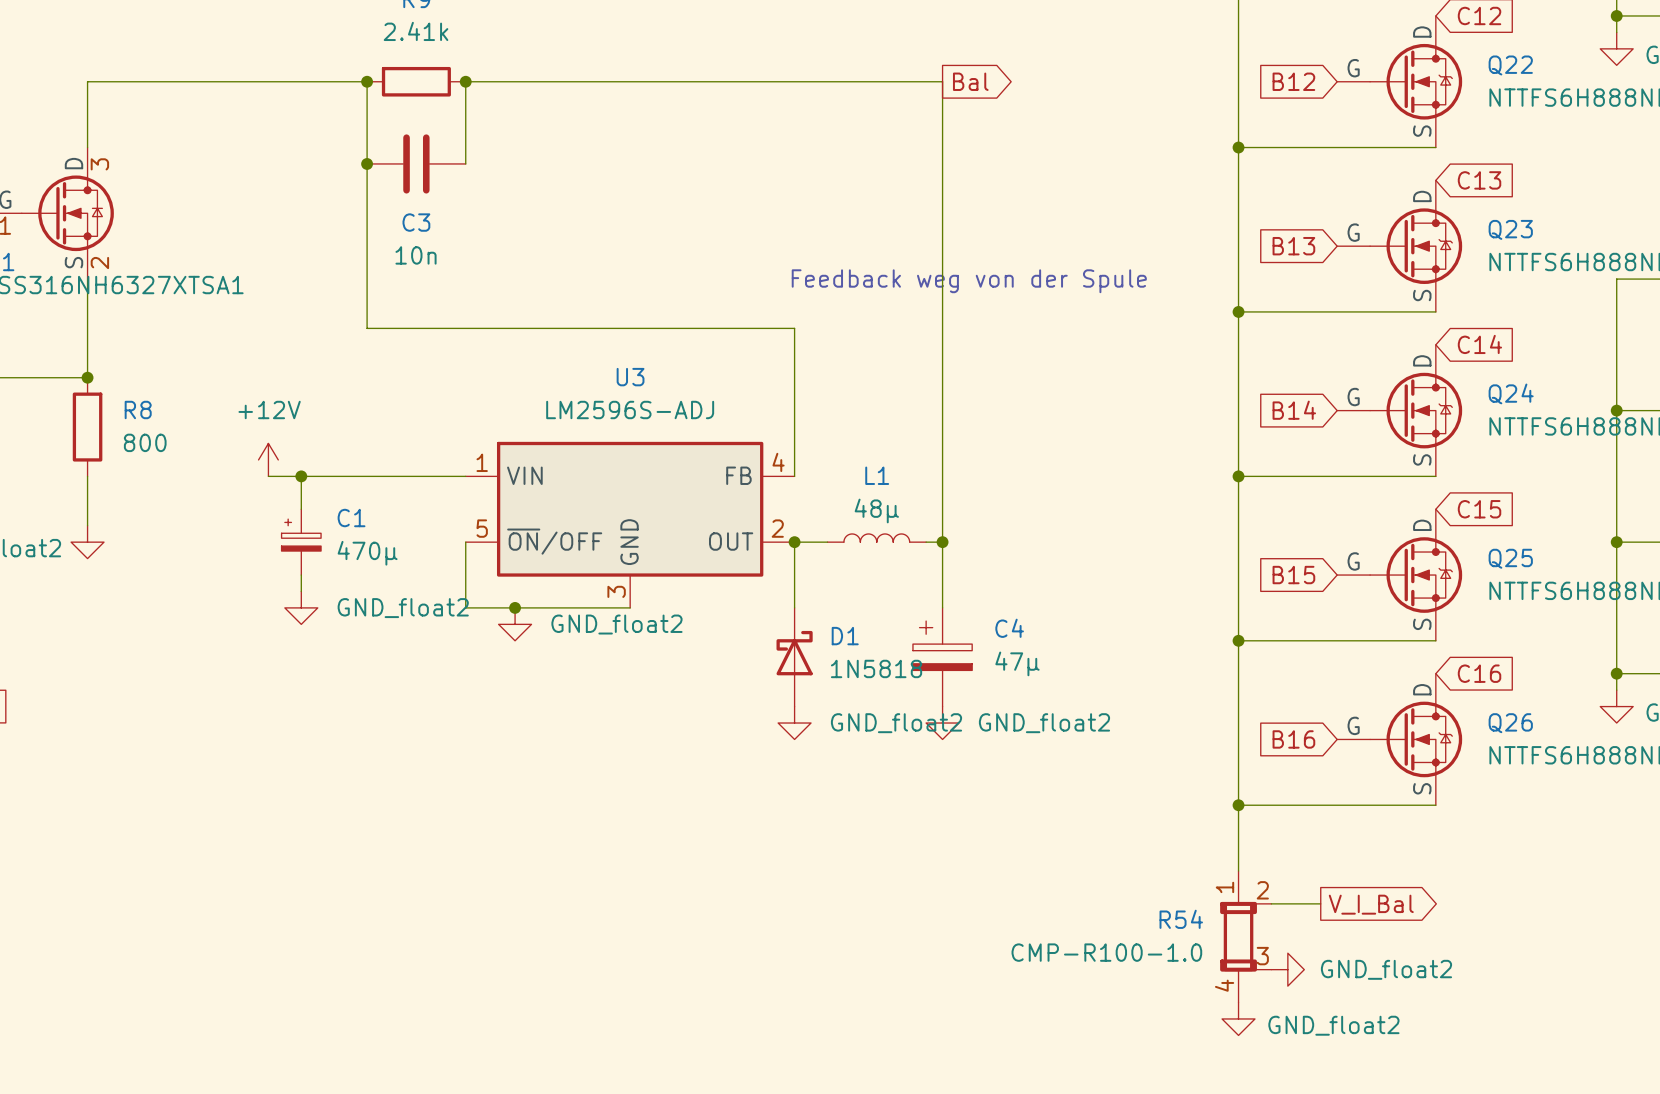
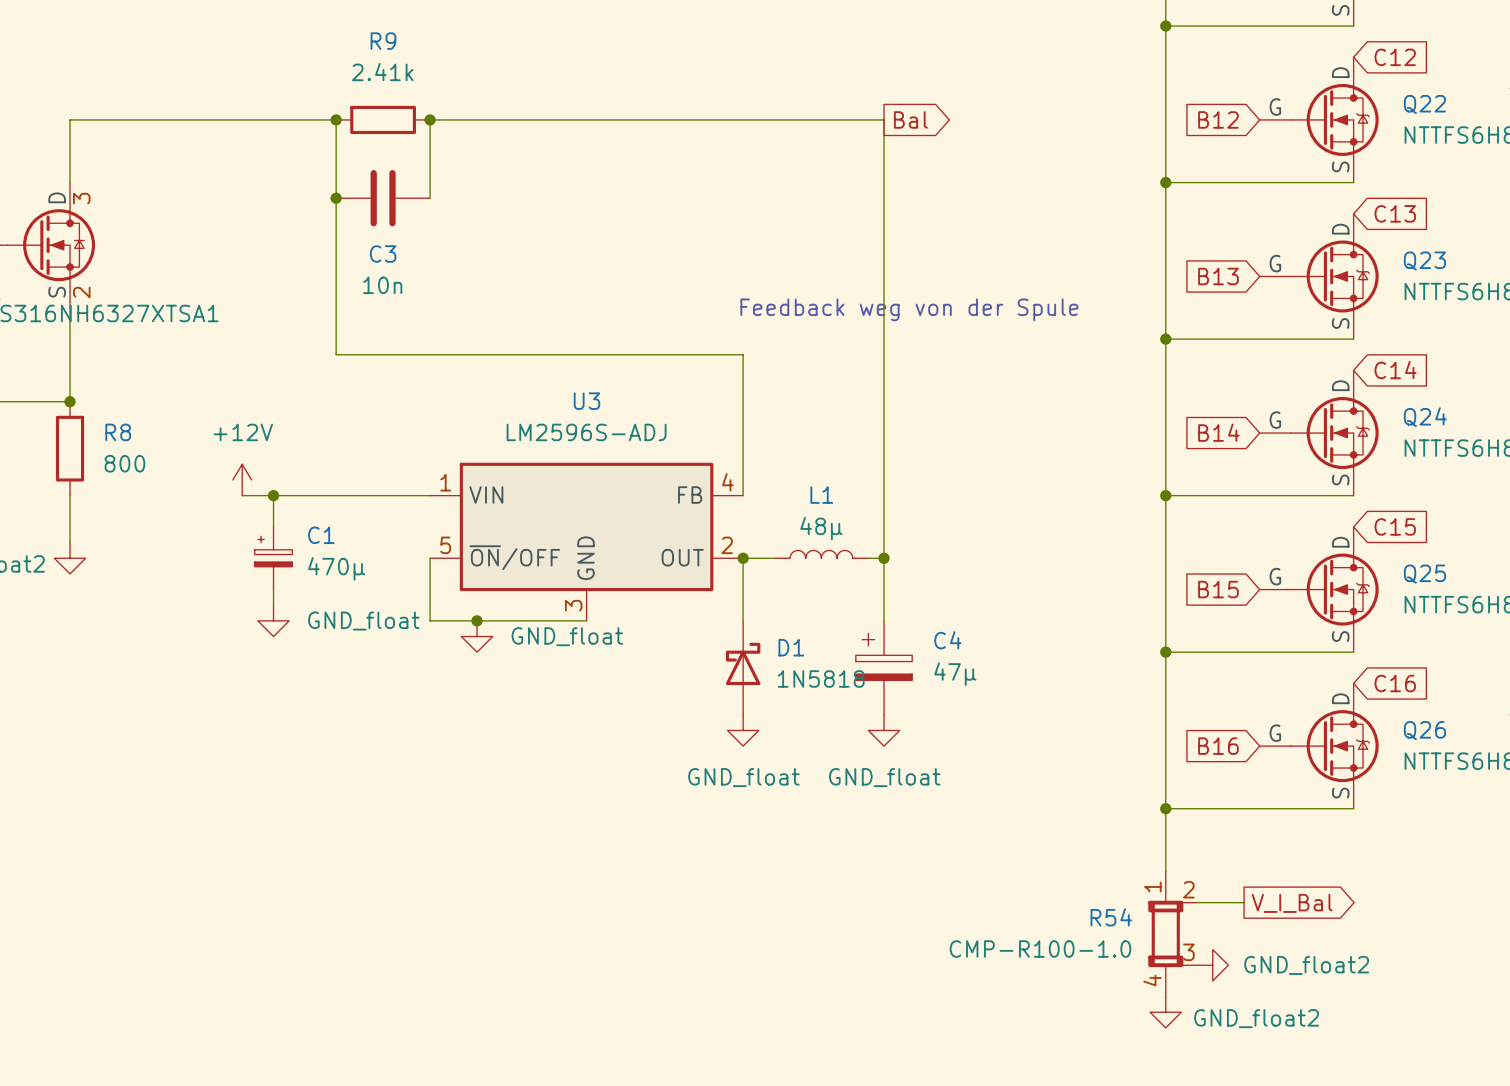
power symbol: GND_float2 (301, 607) -> GND_float (273, 620)
power symbol: GND_float2 (515, 624) -> GND_float (477, 636)
power symbol: GND_float2 (794, 723) -> GND_float (743, 730)
power symbol: GND_float2 (942, 723) -> GND_float (884, 730)

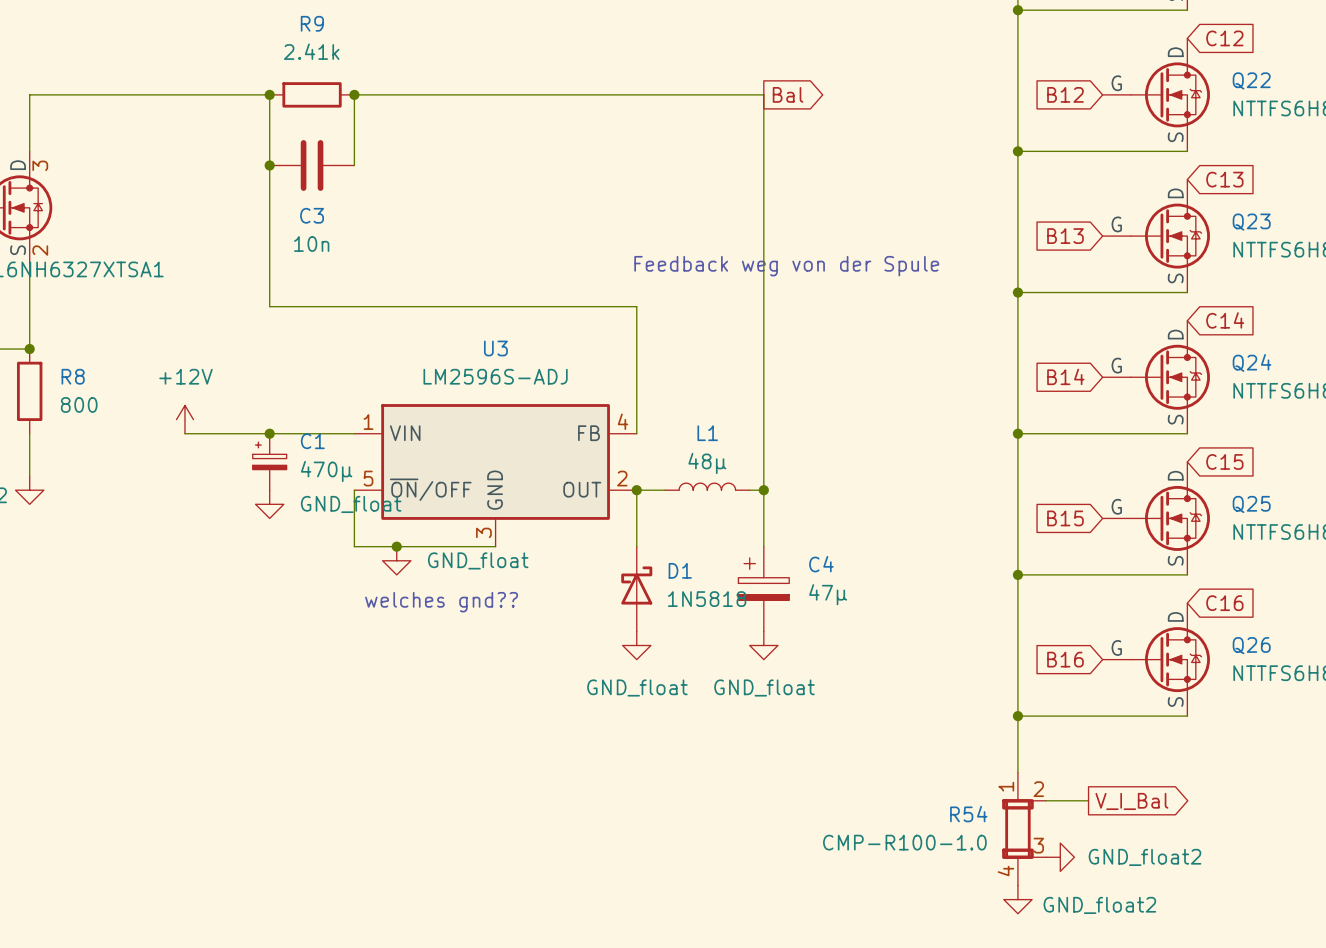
wire: (273, 495) (273, 526) -> none
junction position: (273, 495) -> (269, 433)
C1 position: (273, 558) -> (269, 461)
wire: (273, 589) (273, 605) -> none
power symbol position: GND_float (273, 620) -> GND_float (269, 504)
text: none -> welches gnd?? (441, 602)

